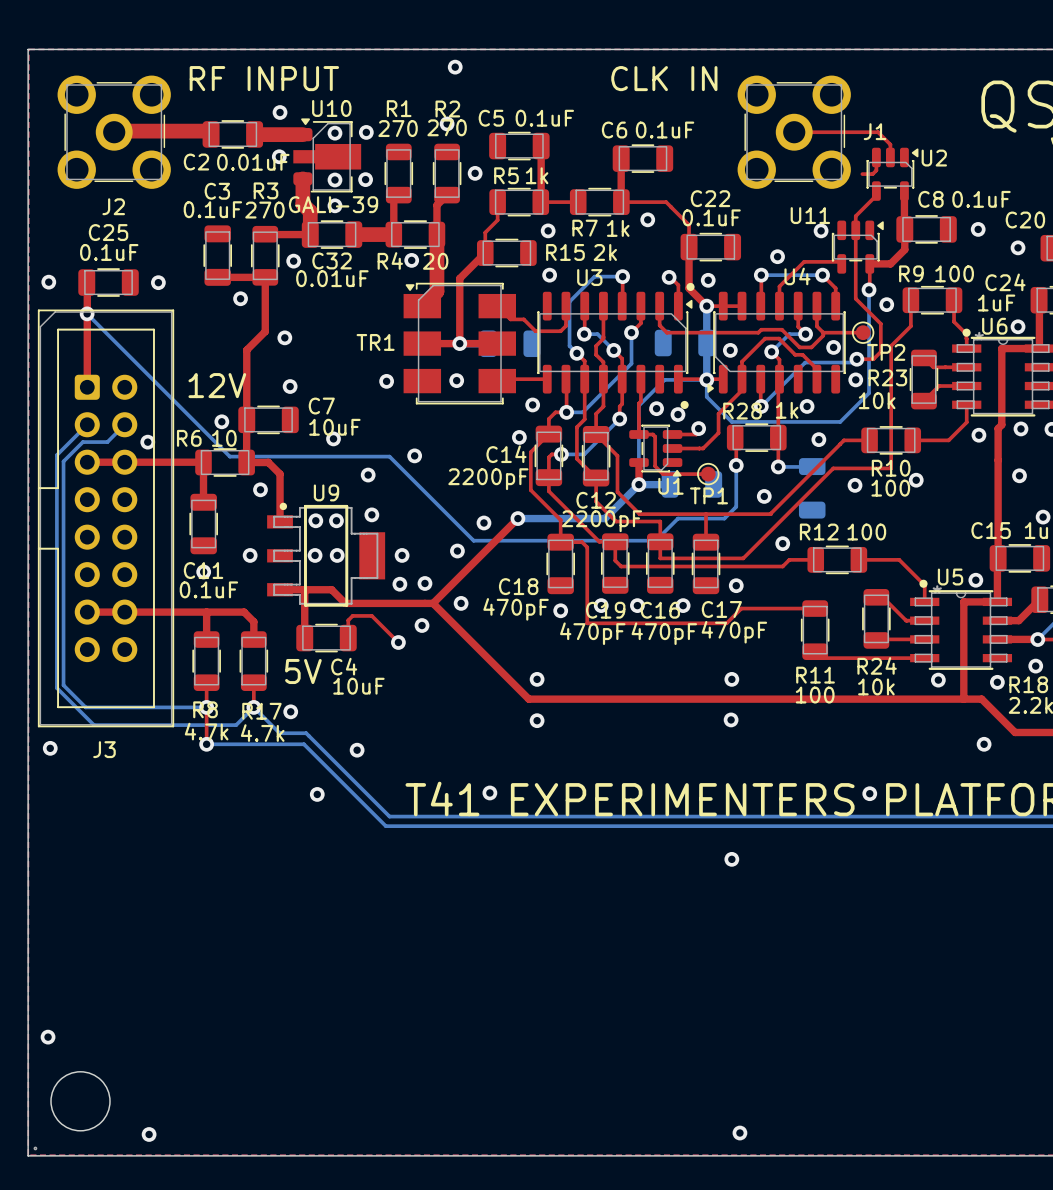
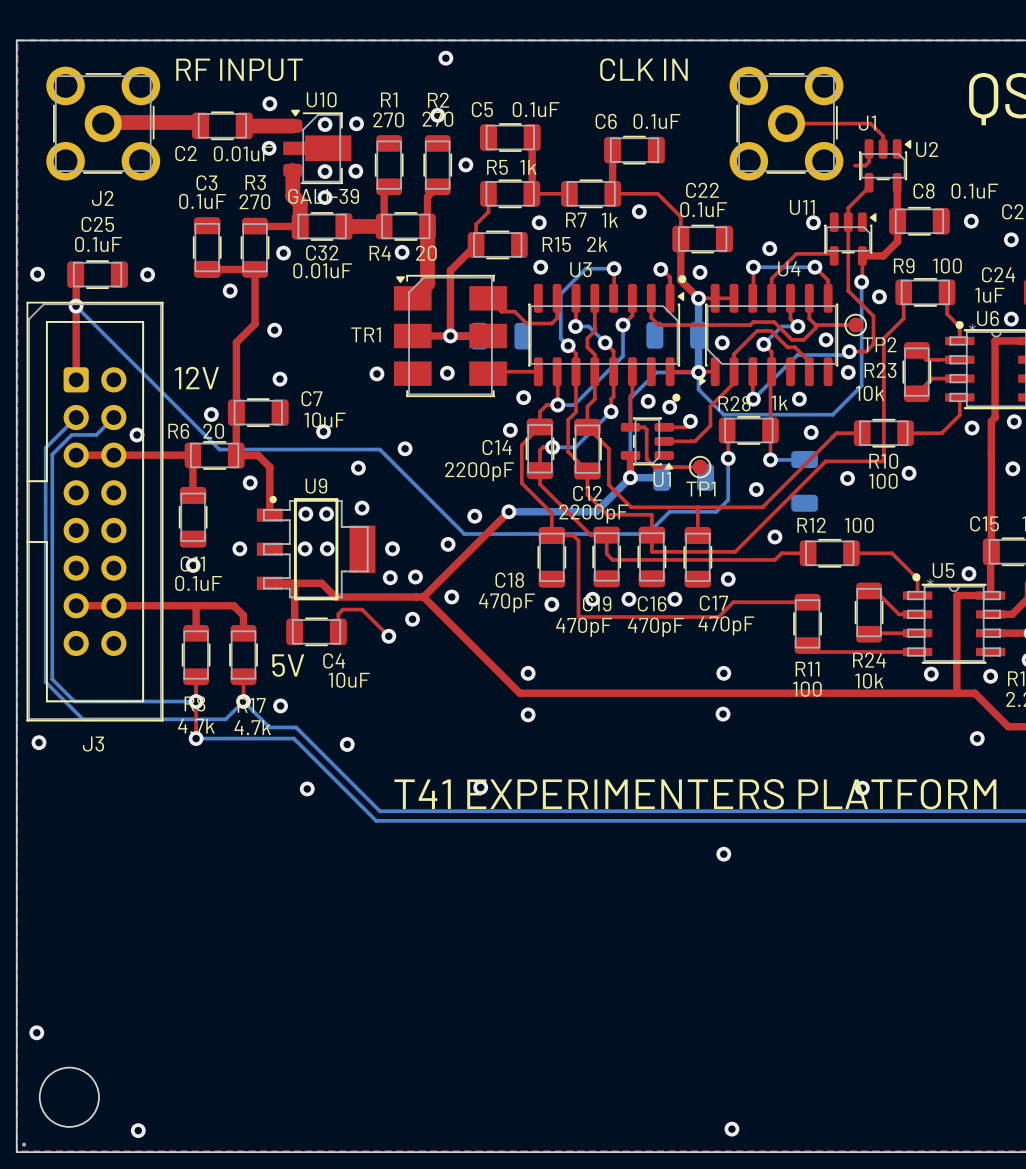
R6 value: 10 (224, 438) -> 20 (213, 431)

